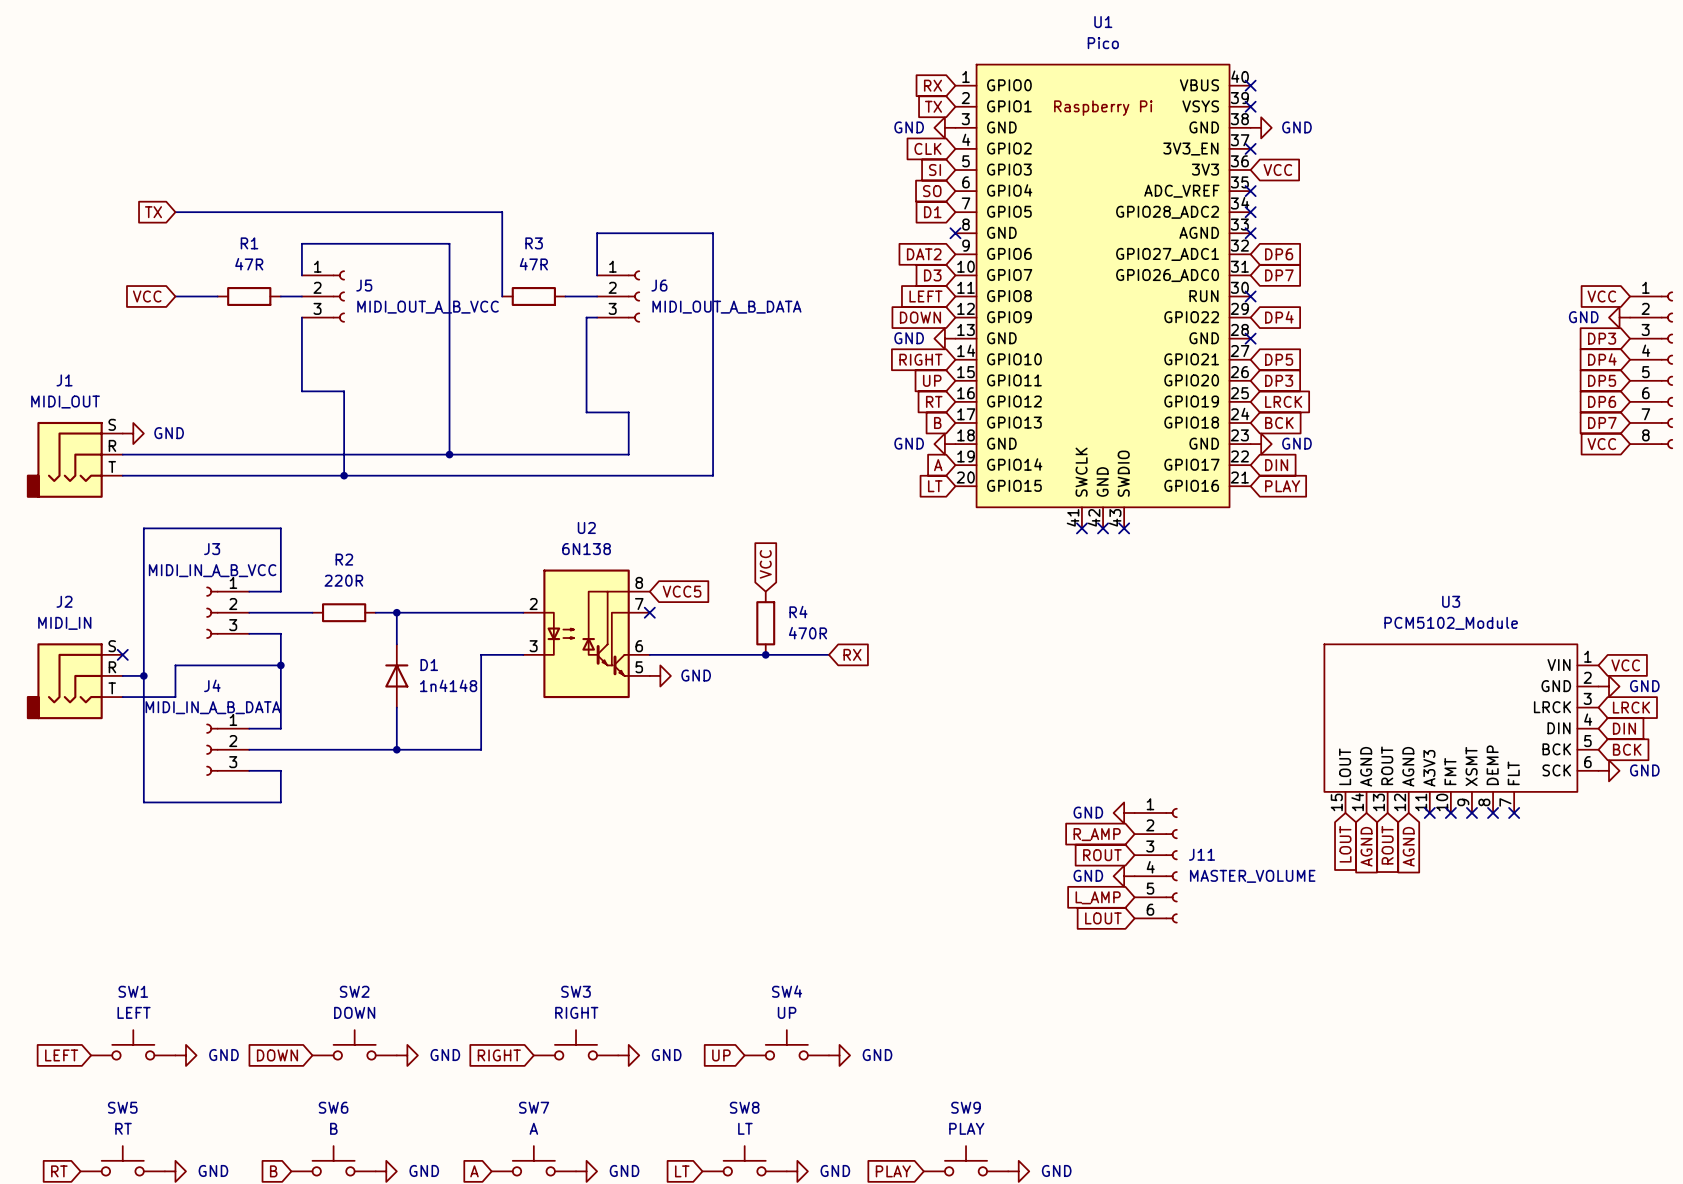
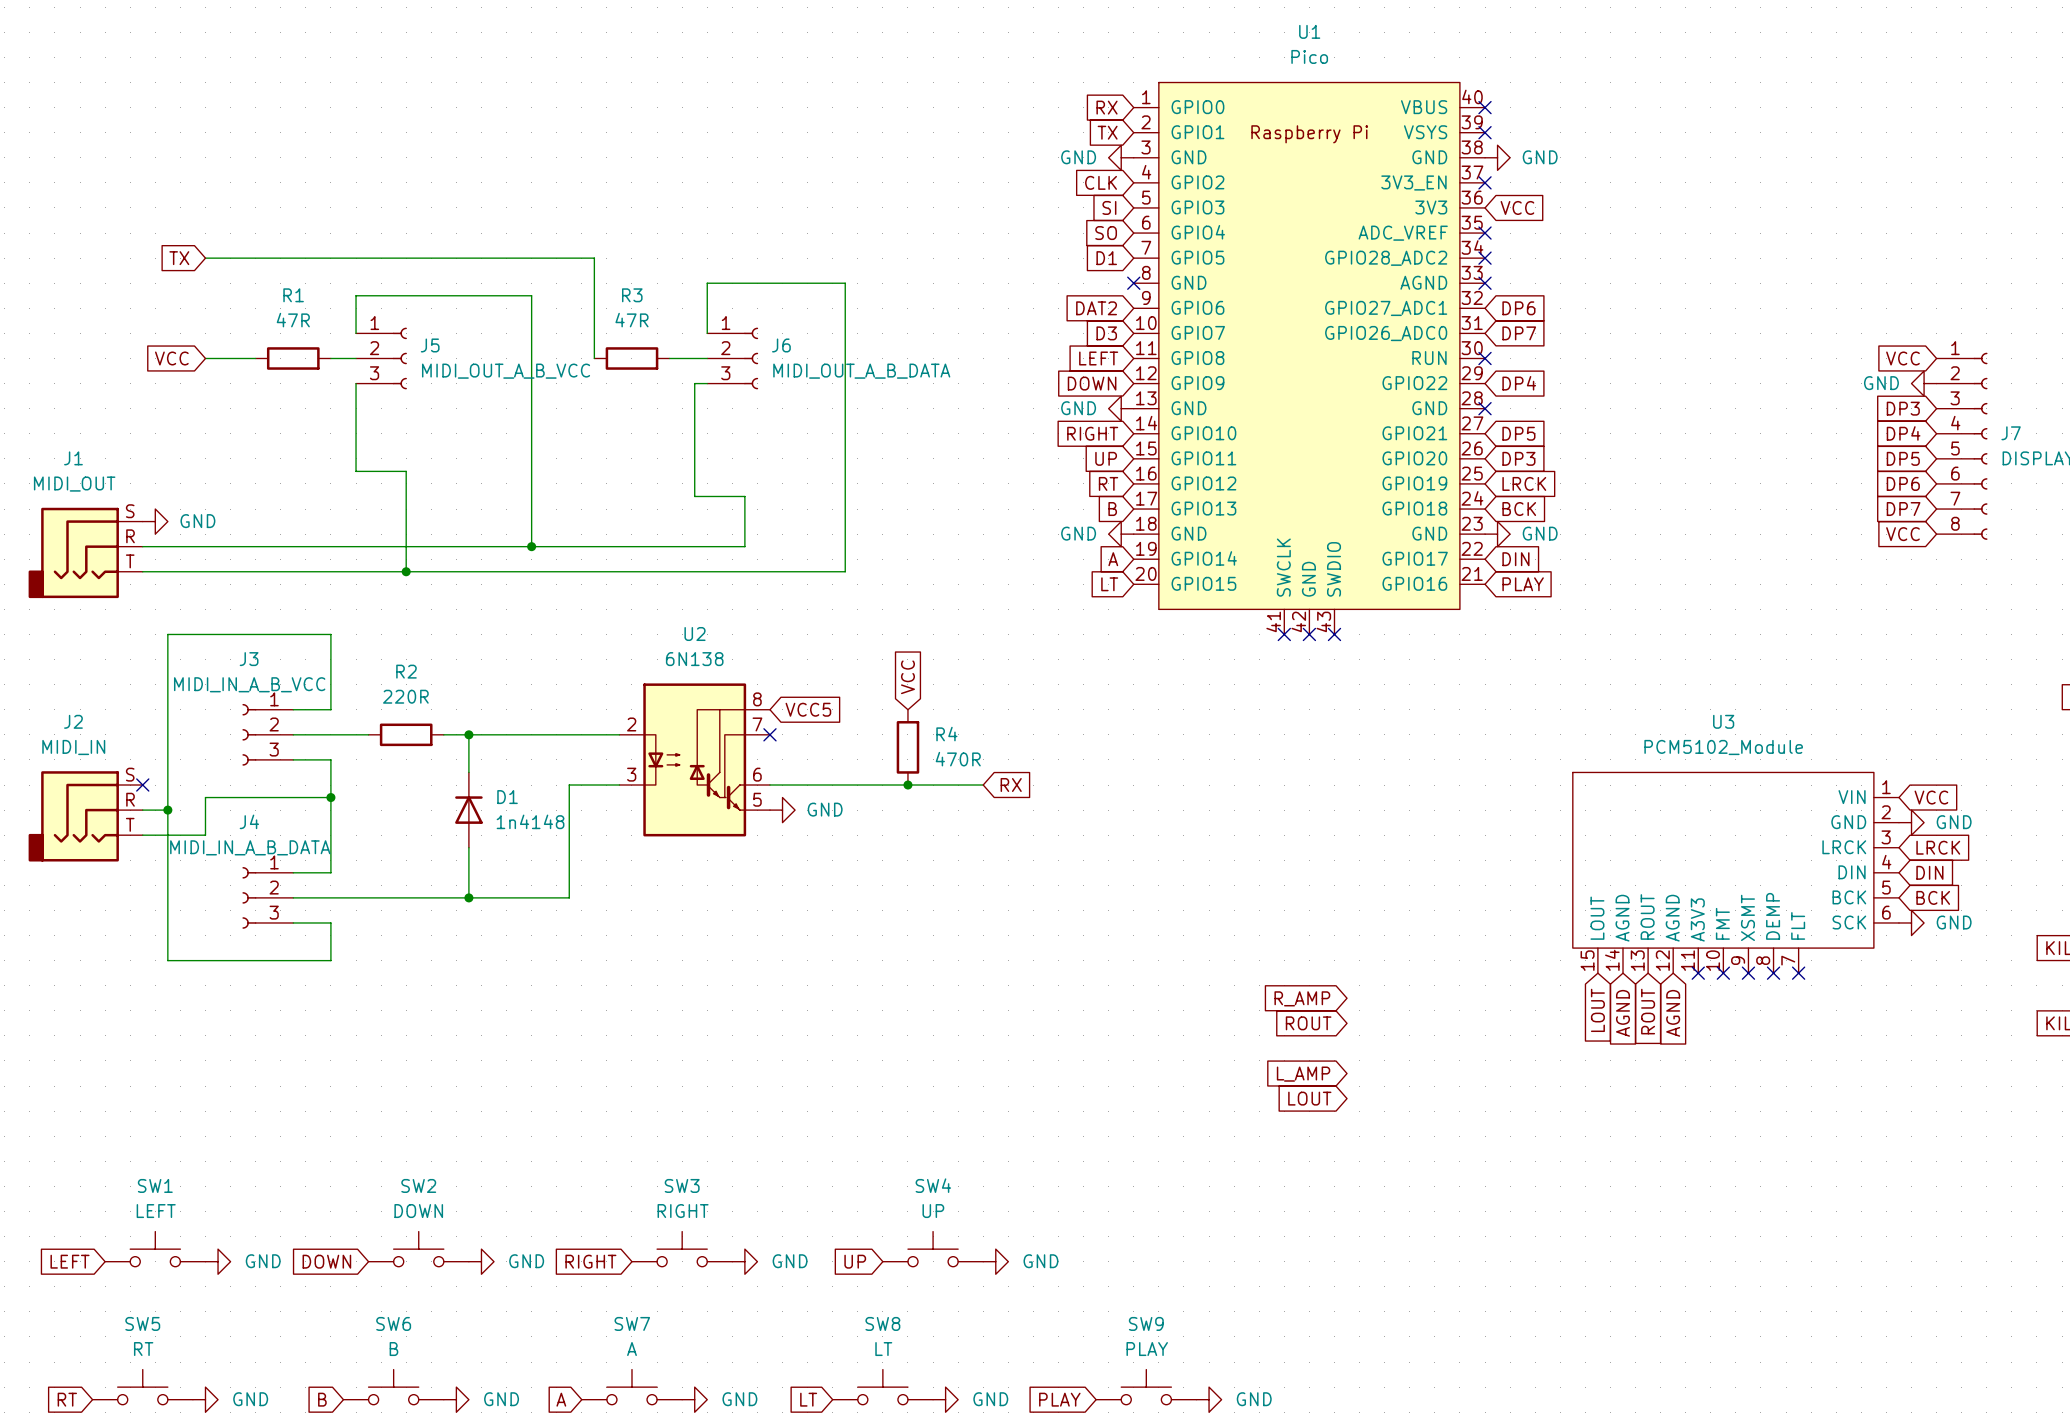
power symbol: GND (1124, 812) -> none
J11: MASTER_VOLUME (1156, 865) -> none
power symbol: GND (1124, 876) -> none

